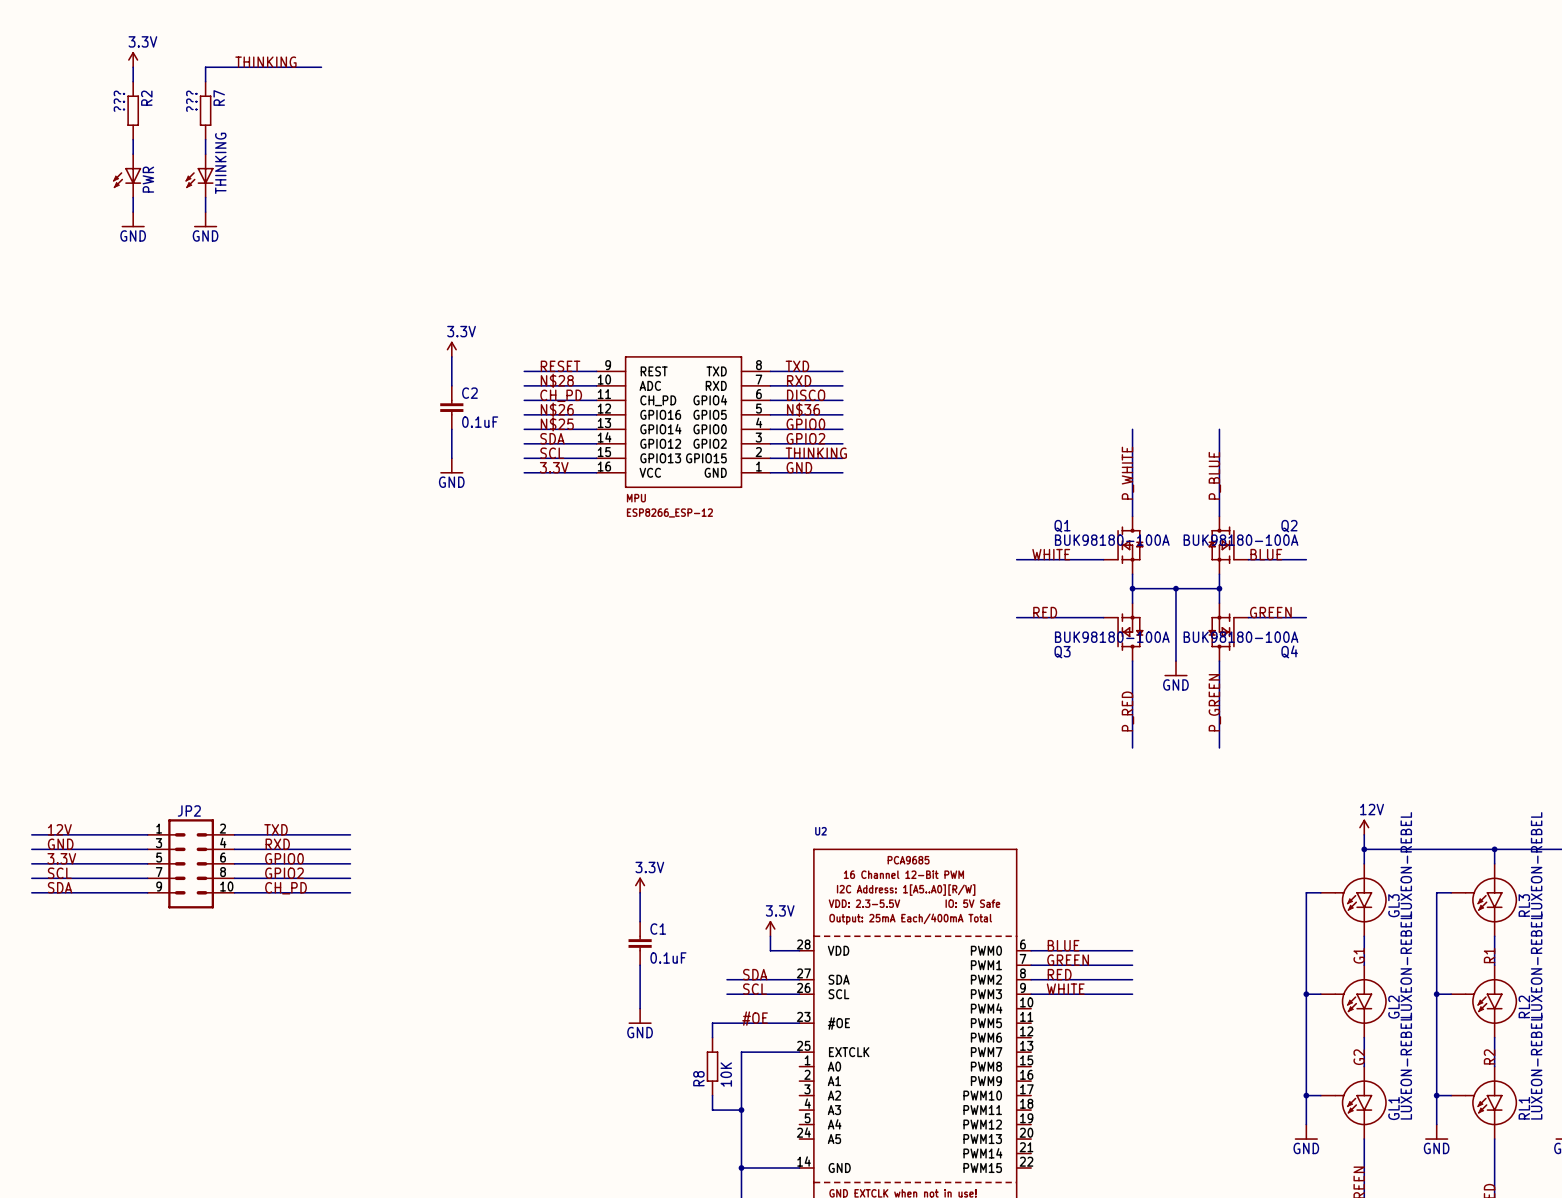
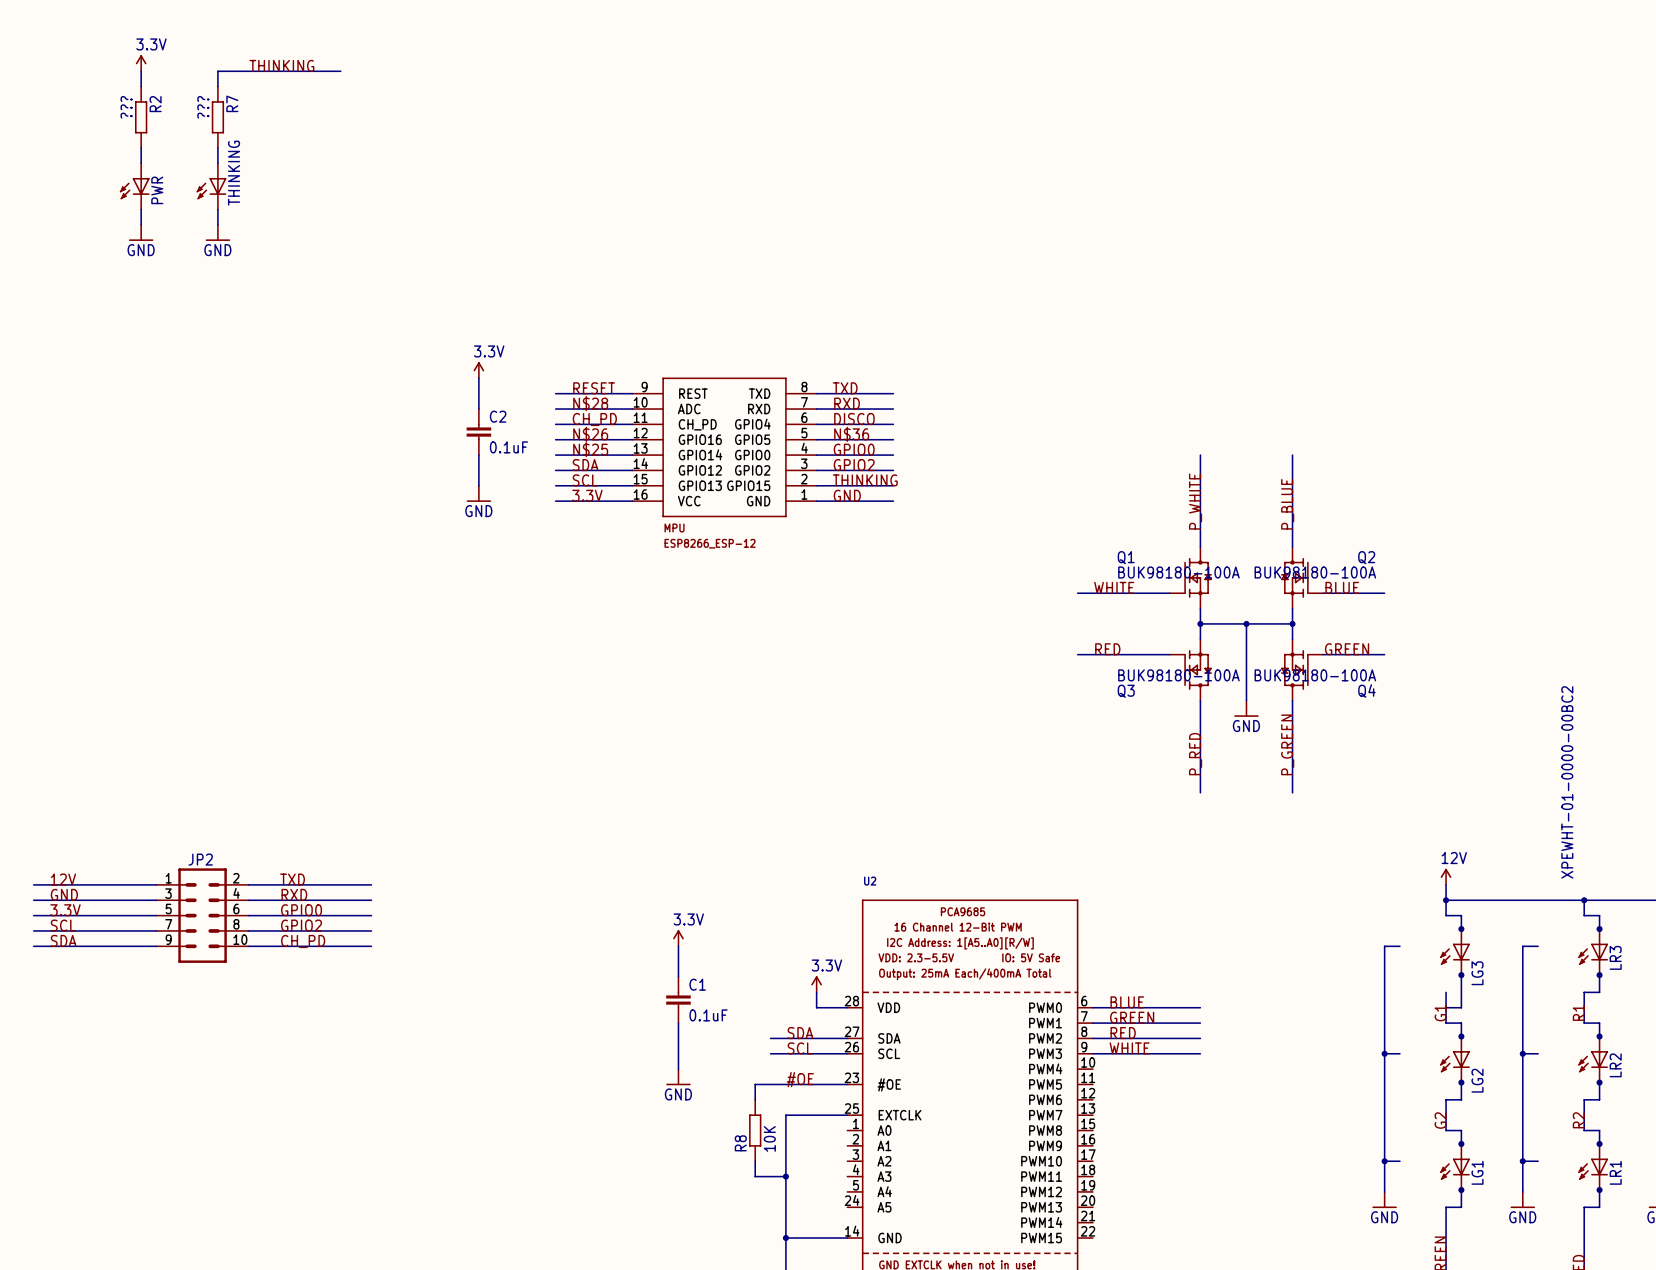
wire: none -> (1446, 915) (1461, 915) (1461, 930)
wire: none -> (1584, 915) (1599, 915) (1599, 930)
junction: none -> (1461, 929)
junction: none -> (1599, 929)
LG3: none -> XPEWHT-01-0000-00BC2 (1455, 952)
LR3: none -> (1593, 952)
GL3: LUXEON-REBEL (1353, 900) -> none
RL3: LUXEON-REBEL (1484, 900) -> none
wire: none -> (1461, 975) (1461, 1007) (1446, 1007)
junction: none -> (1461, 975)
wire: none -> (1599, 975) (1599, 992) (1584, 992)
junction: none -> (1599, 975)
wire: none -> (1446, 1023) (1461, 1023) (1461, 1038)
wire: none -> (1584, 1023) (1599, 1023) (1599, 1038)
junction: none -> (1461, 1036)
junction: none -> (1599, 1036)
LG2: none -> (1455, 1059)
LR2: none -> (1593, 1059)
GL2: LUXEON-REBEL (1353, 1001) -> none
RL2: LUXEON-REBEL (1484, 1001) -> none
wire: none -> (1461, 1082) (1461, 1099) (1446, 1099)
junction: none -> (1461, 1082)
wire: none -> (1599, 1082) (1599, 1099) (1584, 1099)
junction: none -> (1599, 1082)
wire: none -> (1446, 1130) (1461, 1130) (1461, 1145)
wire: none -> (1584, 1130) (1599, 1130) (1599, 1145)
junction: none -> (1461, 1143)
junction: none -> (1599, 1143)
LG1: none -> (1455, 1167)
LR1: none -> (1593, 1167)
GL1: LUXEON-REBEL (1353, 1102) -> none
RL1: LUXEON-REBEL (1484, 1102) -> none
wire: none -> (1461, 1190) (1461, 1207) (1446, 1207)
junction: none -> (1461, 1190)
wire: none -> (1599, 1190) (1599, 1207) (1584, 1207)
junction: none -> (1599, 1190)

